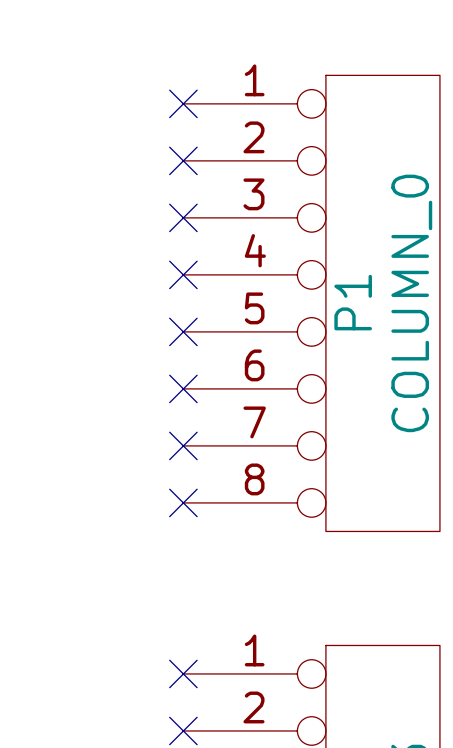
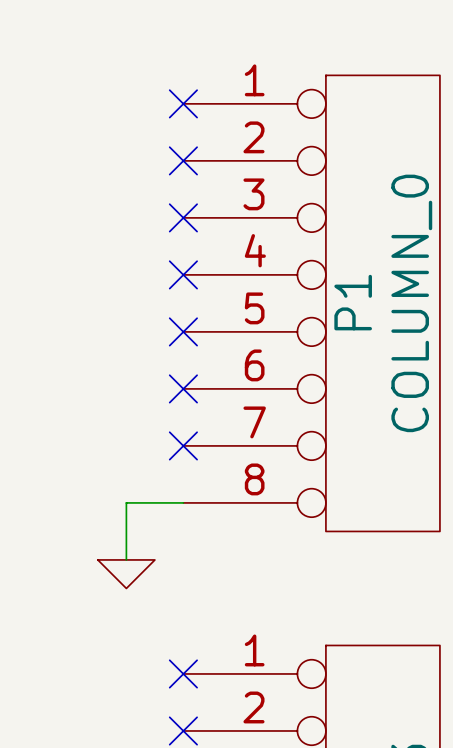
wire: none -> (183, 502) (126, 502) (126, 559)
no-connect mark: (183, 502) -> none
power symbol: none -> (126, 574)

